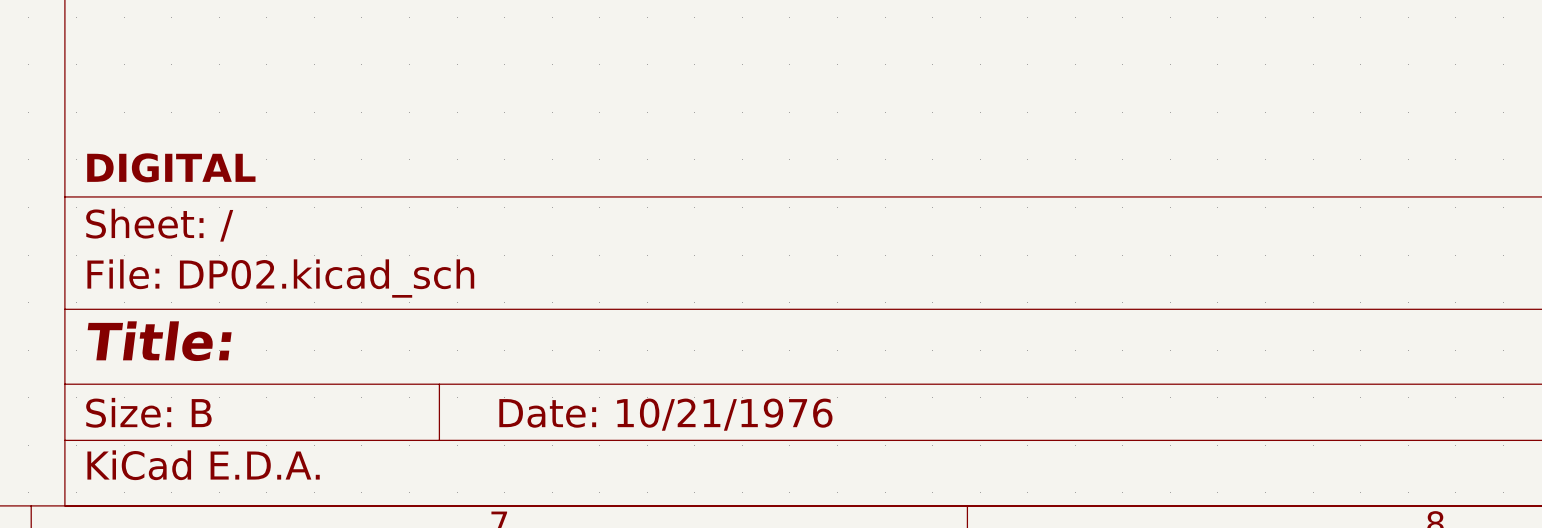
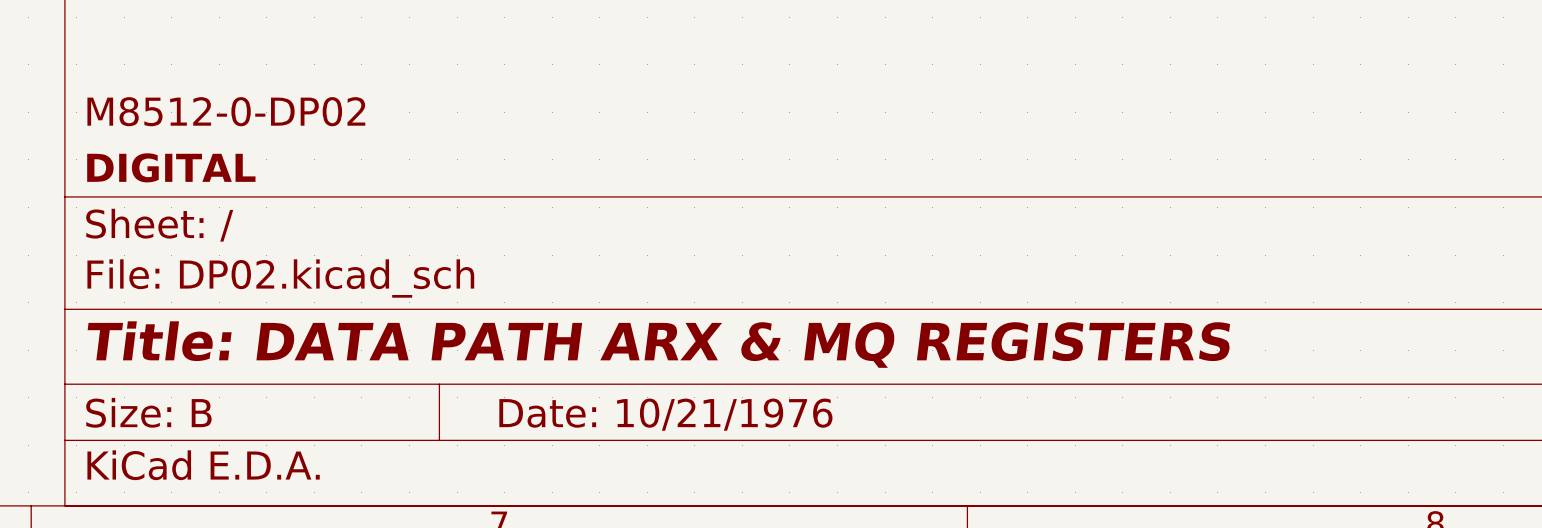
title block: none -> M8512-0-DP02 (226, 111)
title block: Title: (159, 341) -> Title: DATA PATH ARX & MQ REGISTERS (658, 344)

